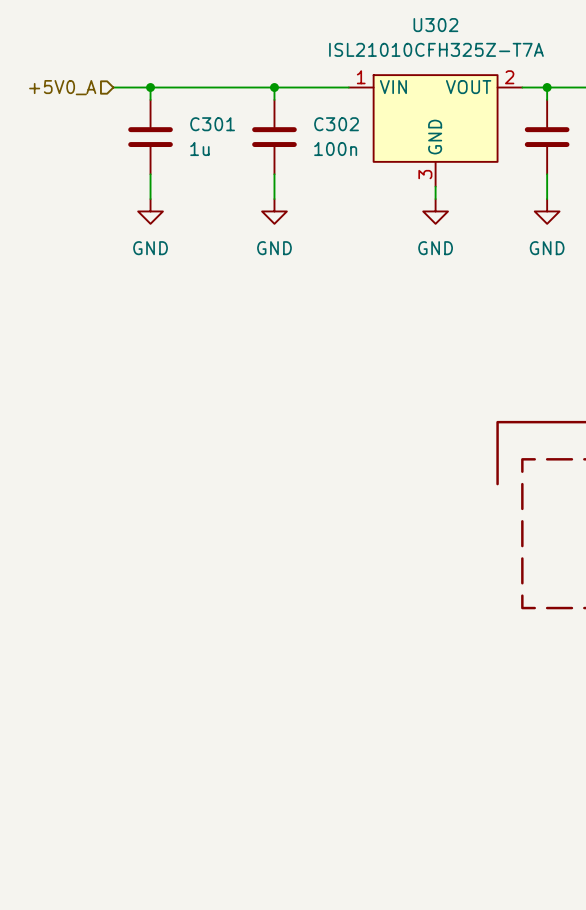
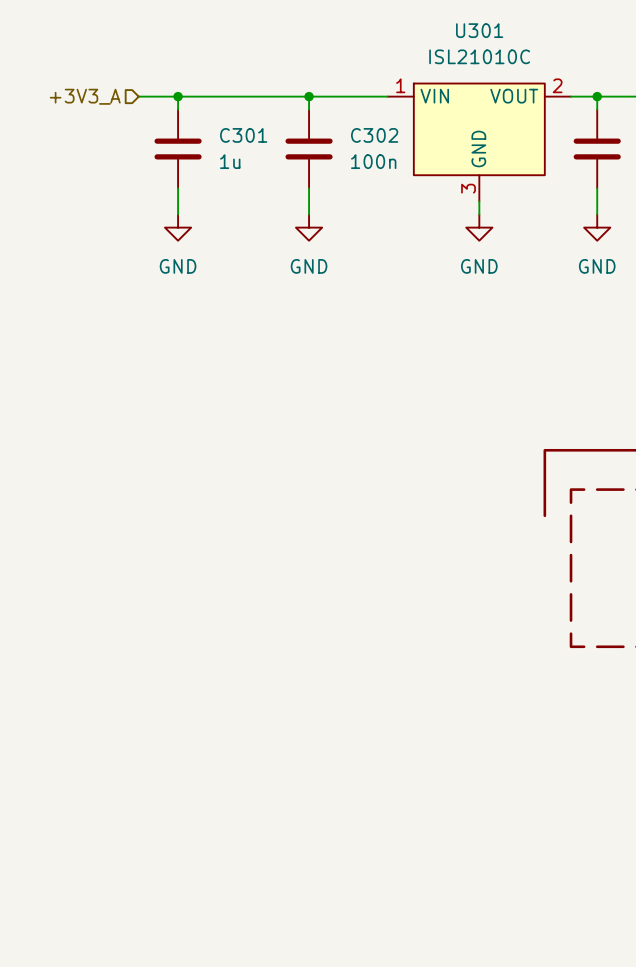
U302 name: U302 (435, 25) -> U301 (479, 30)
U302 value: ISL21010CFH325Z-T7A (436, 49) -> ISL21010C (479, 56)
hierarchical label: +5V0_A (62, 87) -> +3V3_A (85, 96)

